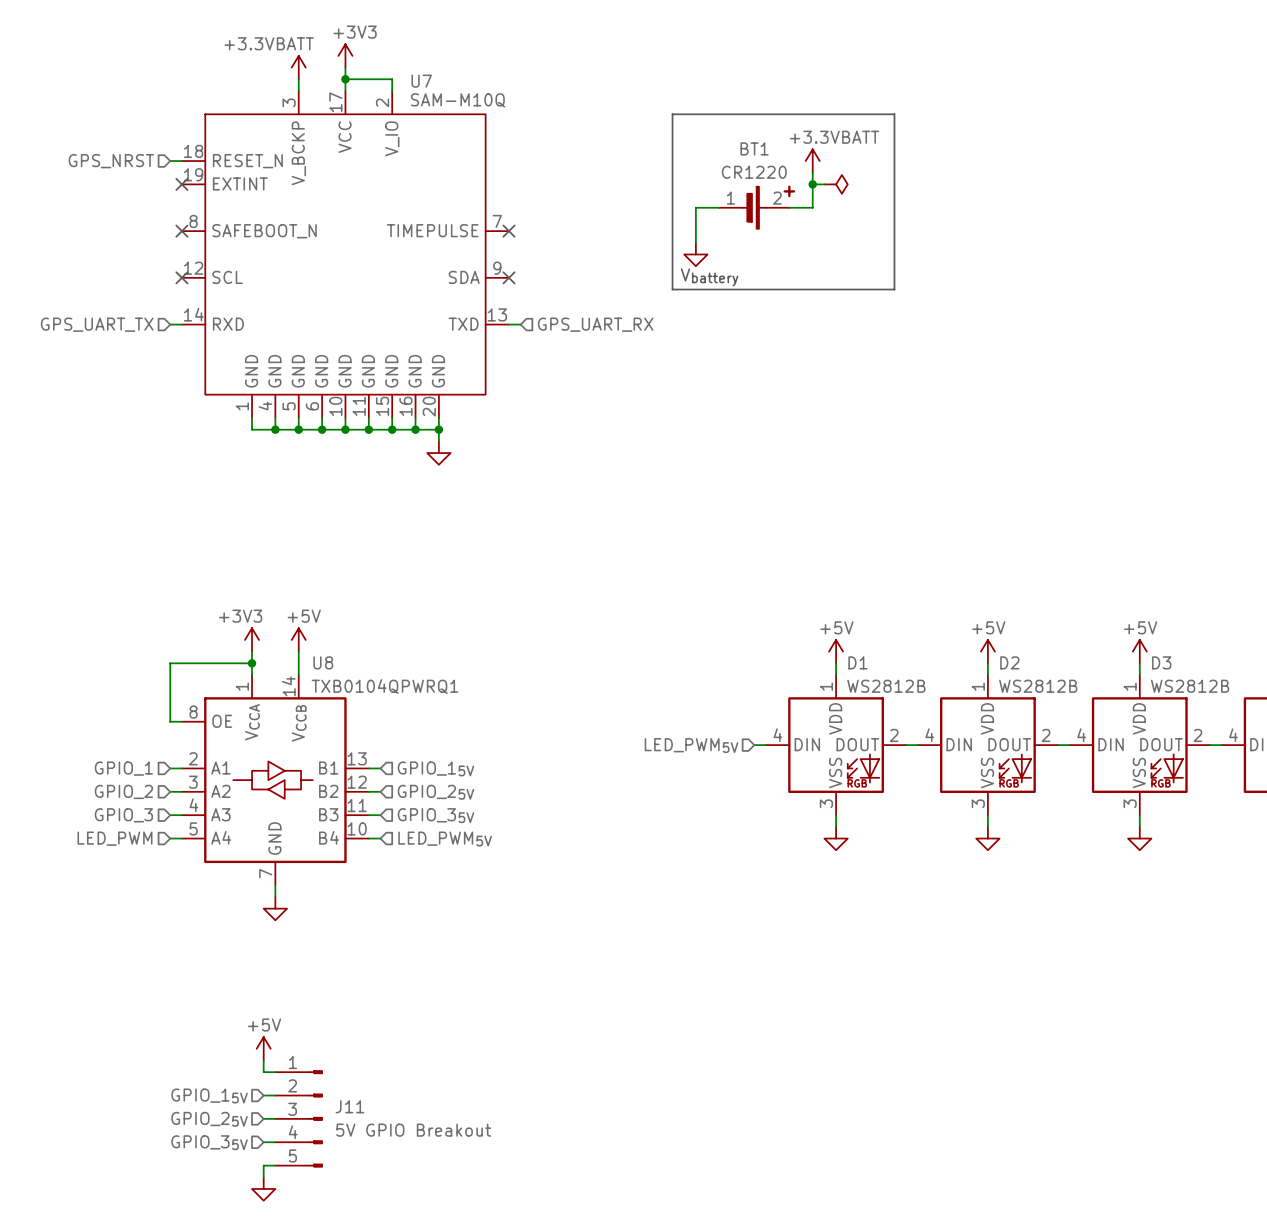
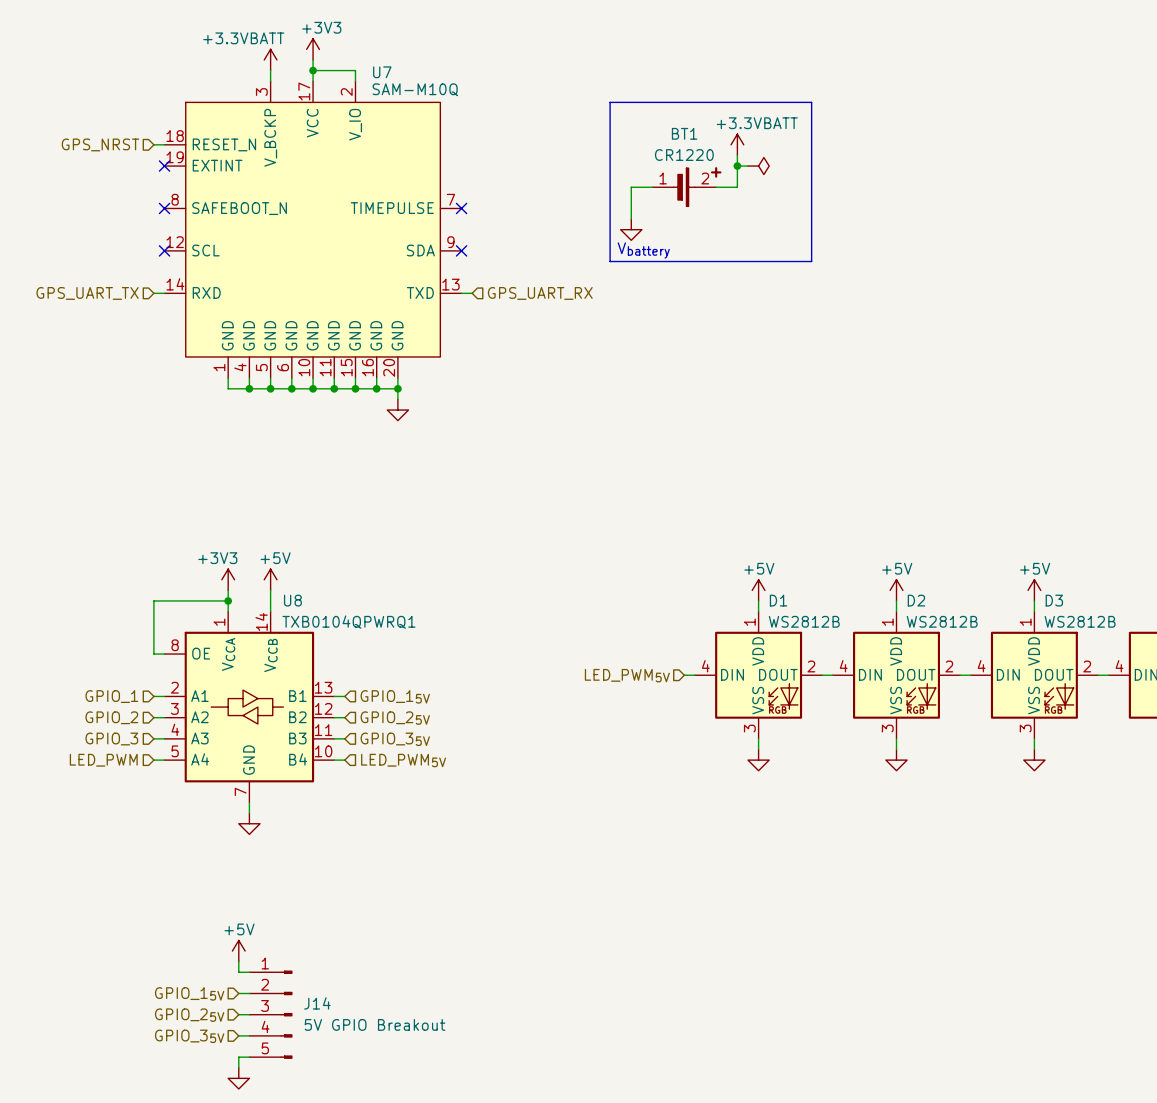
J11 name: J11 (349, 1106) -> J14 (317, 1003)

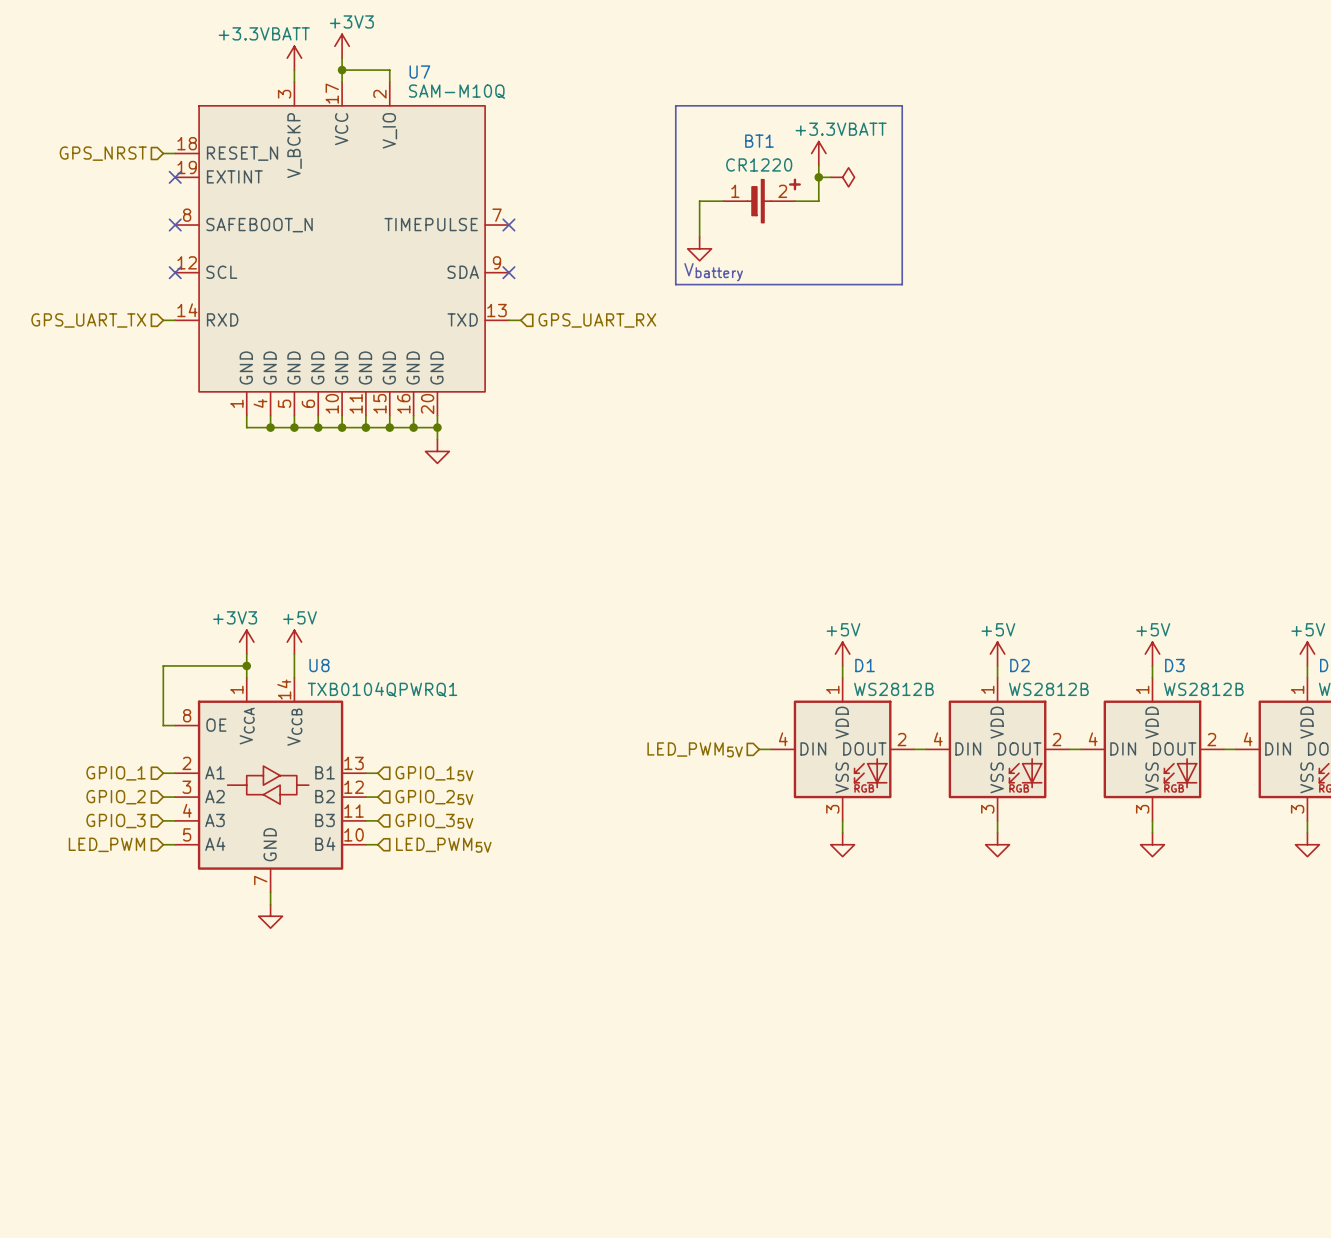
power symbol: +5V (238, 951) -> none
wire: (238, 961) (238, 972) (249, 972) -> none
hierarchical label: GPIO_15V (189, 993) -> none
wire: (238, 993) (249, 993) -> none
wire: (238, 1014) (249, 1014) -> none
J14: 5V GPIO Breakout (270, 1014) -> none
hierarchical label: GPIO_25V (189, 1015) -> none
wire: (238, 1035) (249, 1035) -> none
hierarchical label: GPIO_35V (189, 1036) -> none
wire: (249, 1057) (238, 1057) (238, 1067) -> none
power symbol: (238, 1078) -> none

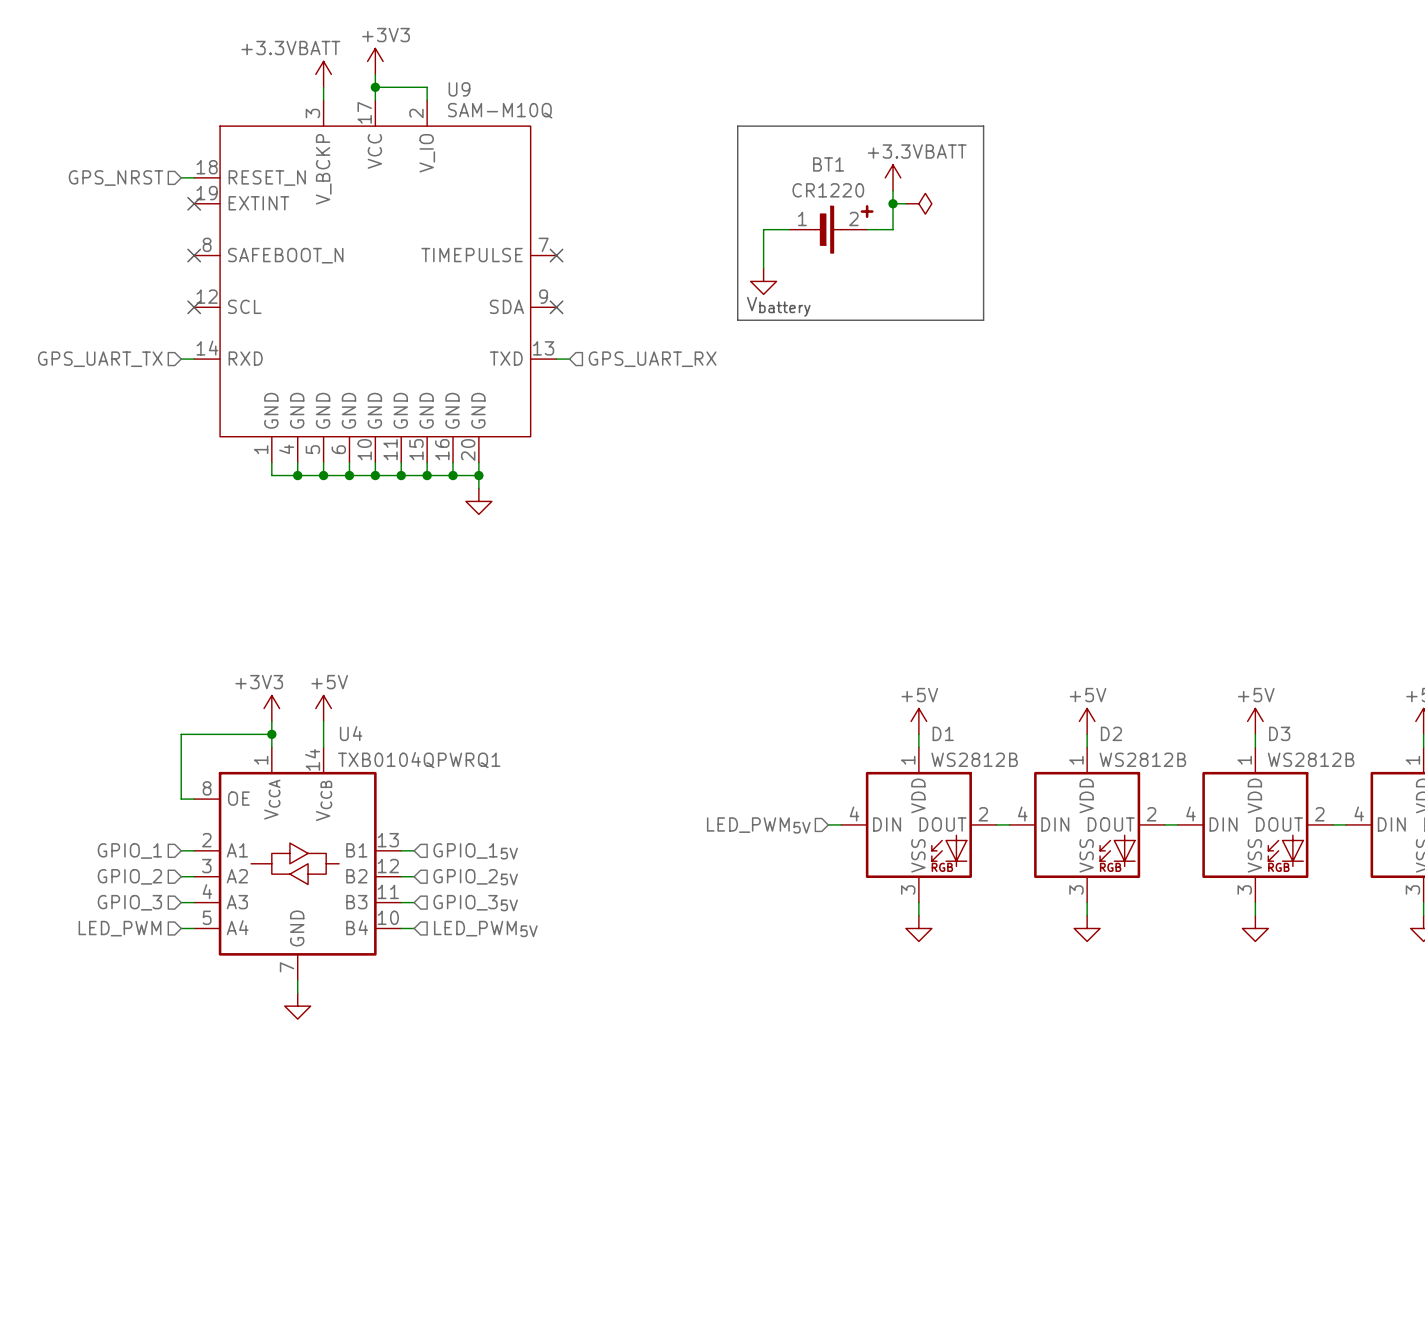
U7 name: U7 (419, 72) -> U9 (459, 89)
U8 name: U8 (319, 665) -> U4 (351, 733)

